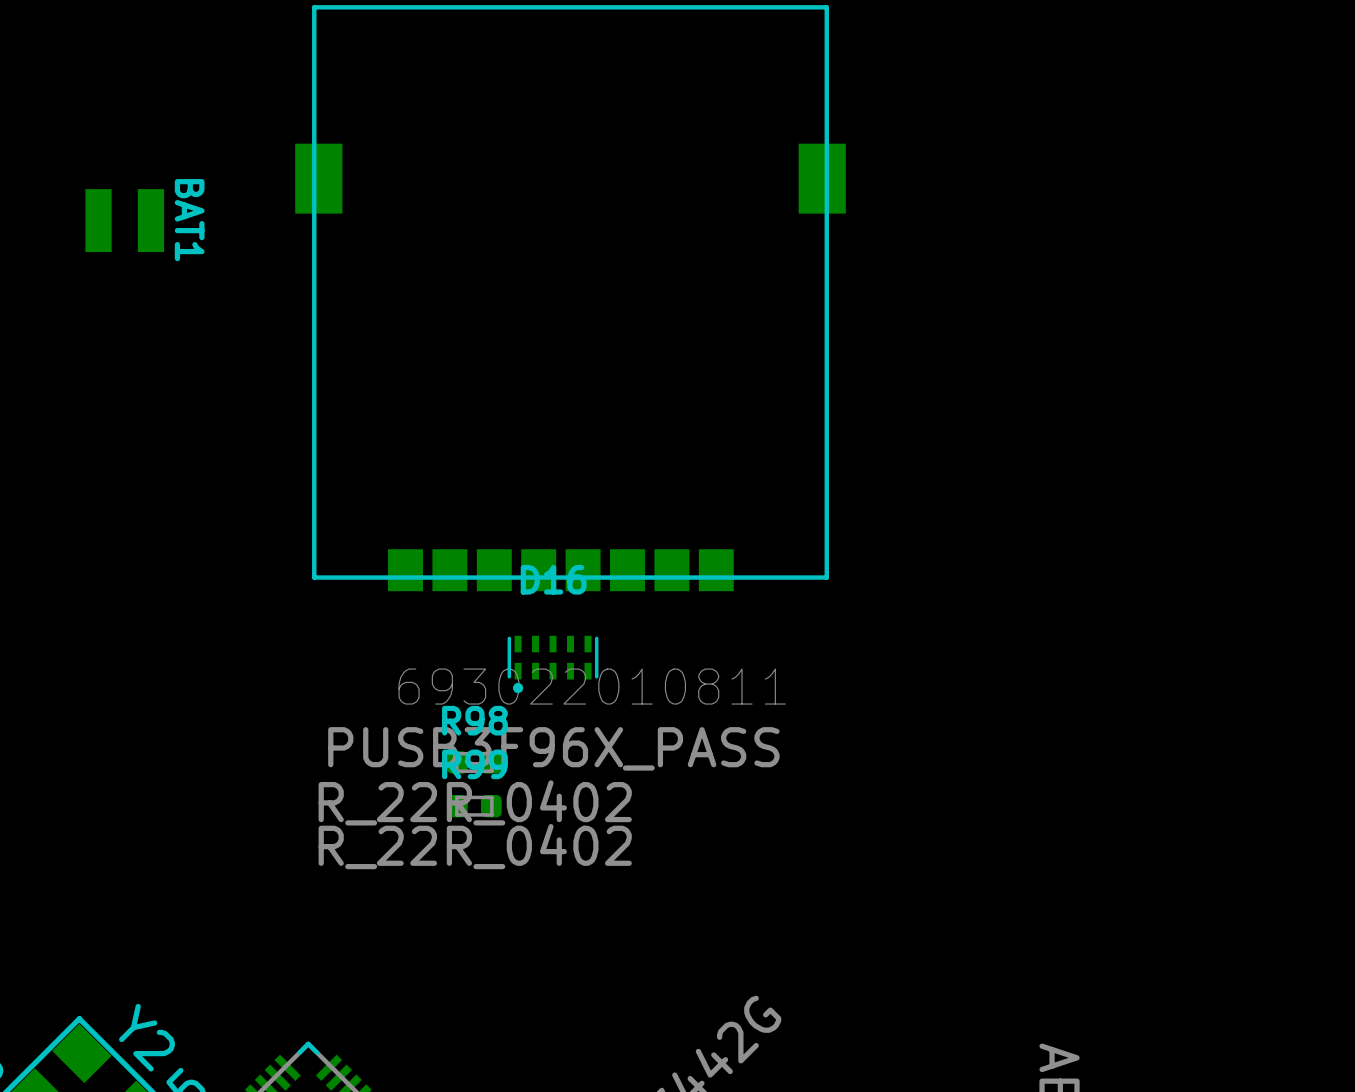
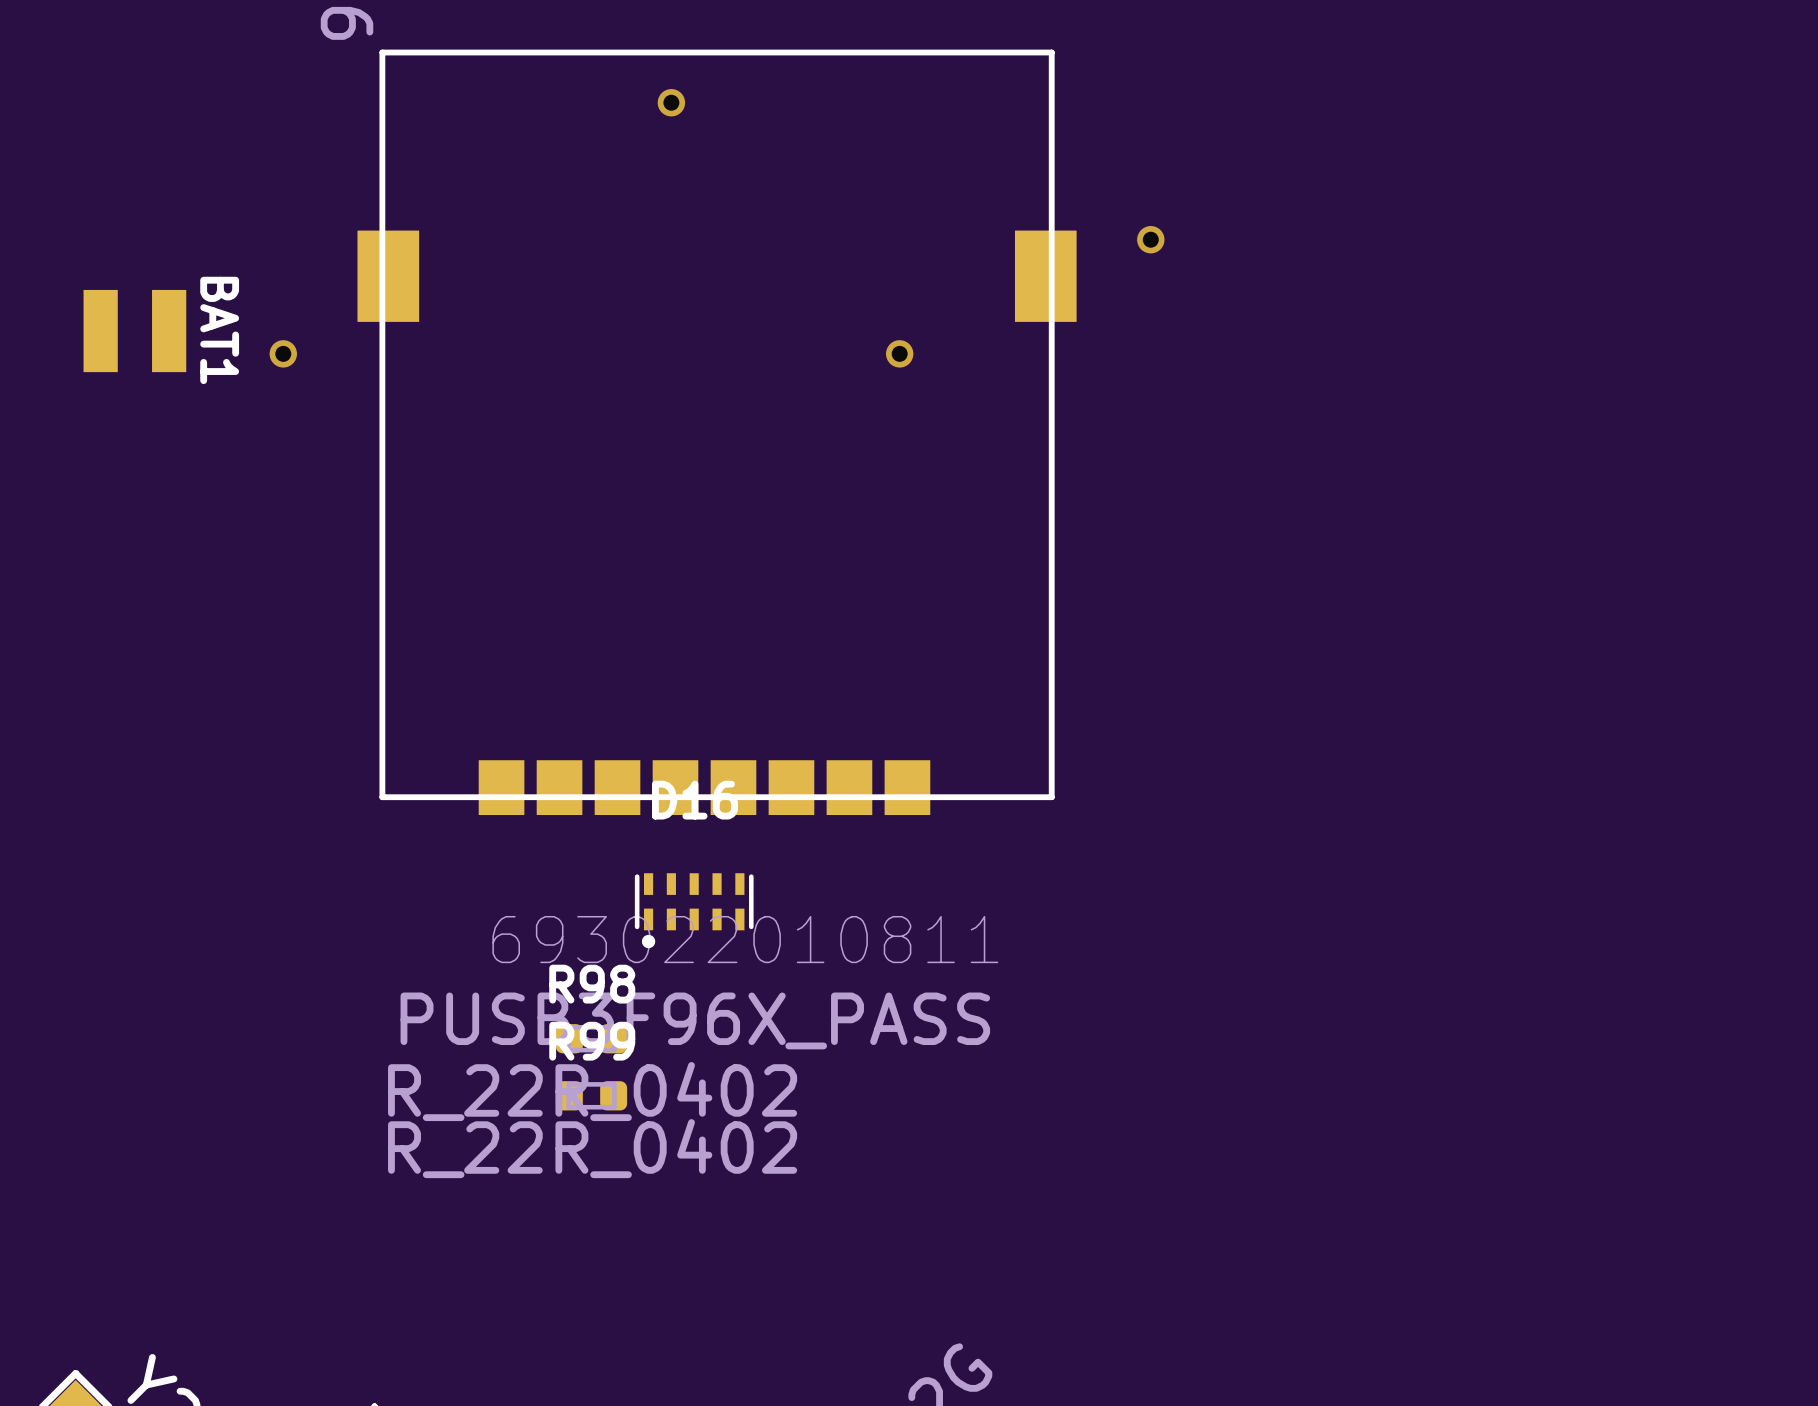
via: none -> (671, 102)
via: none -> (1150, 239)
via: none -> (283, 353)
via: none -> (899, 353)

